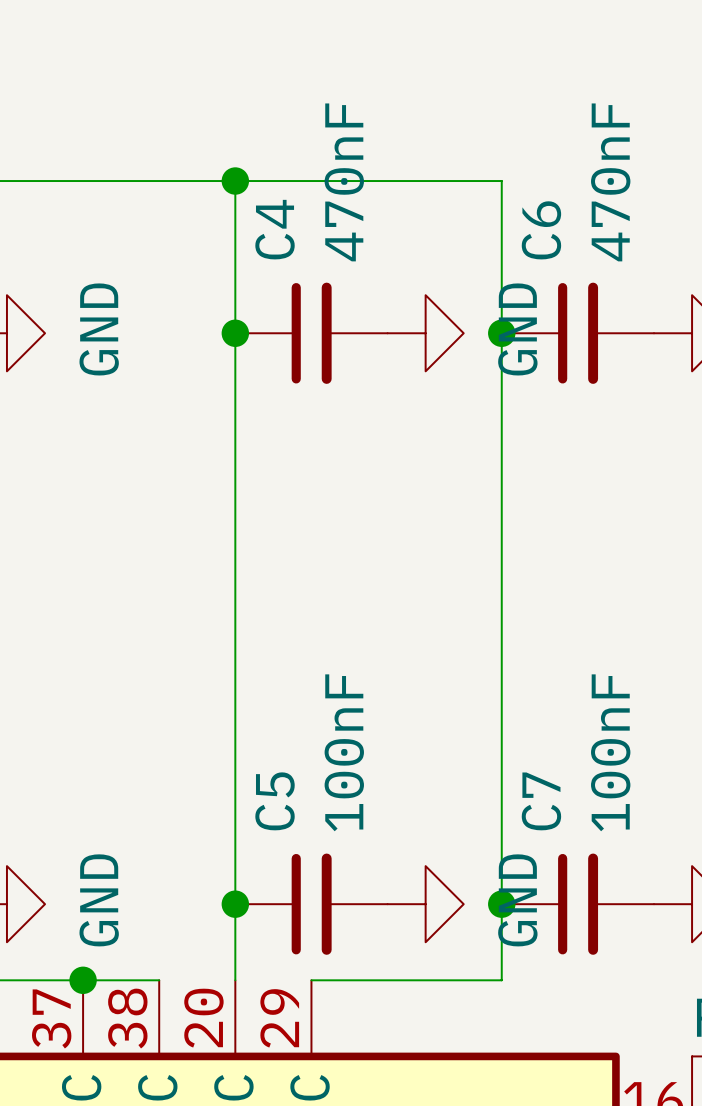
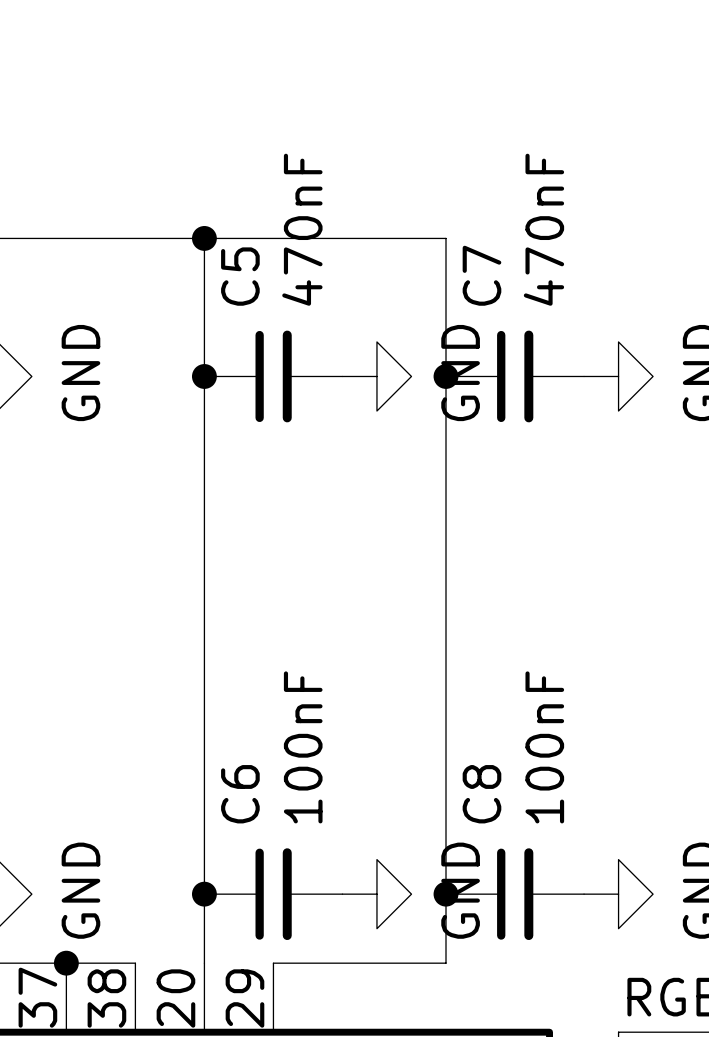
C4 name: C4 (275, 229) -> C5 (240, 276)
C6 name: C6 (541, 230) -> C7 (481, 275)
C5 name: C5 (275, 801) -> C6 (240, 794)
C7 name: C7 (541, 801) -> C8 (481, 794)

